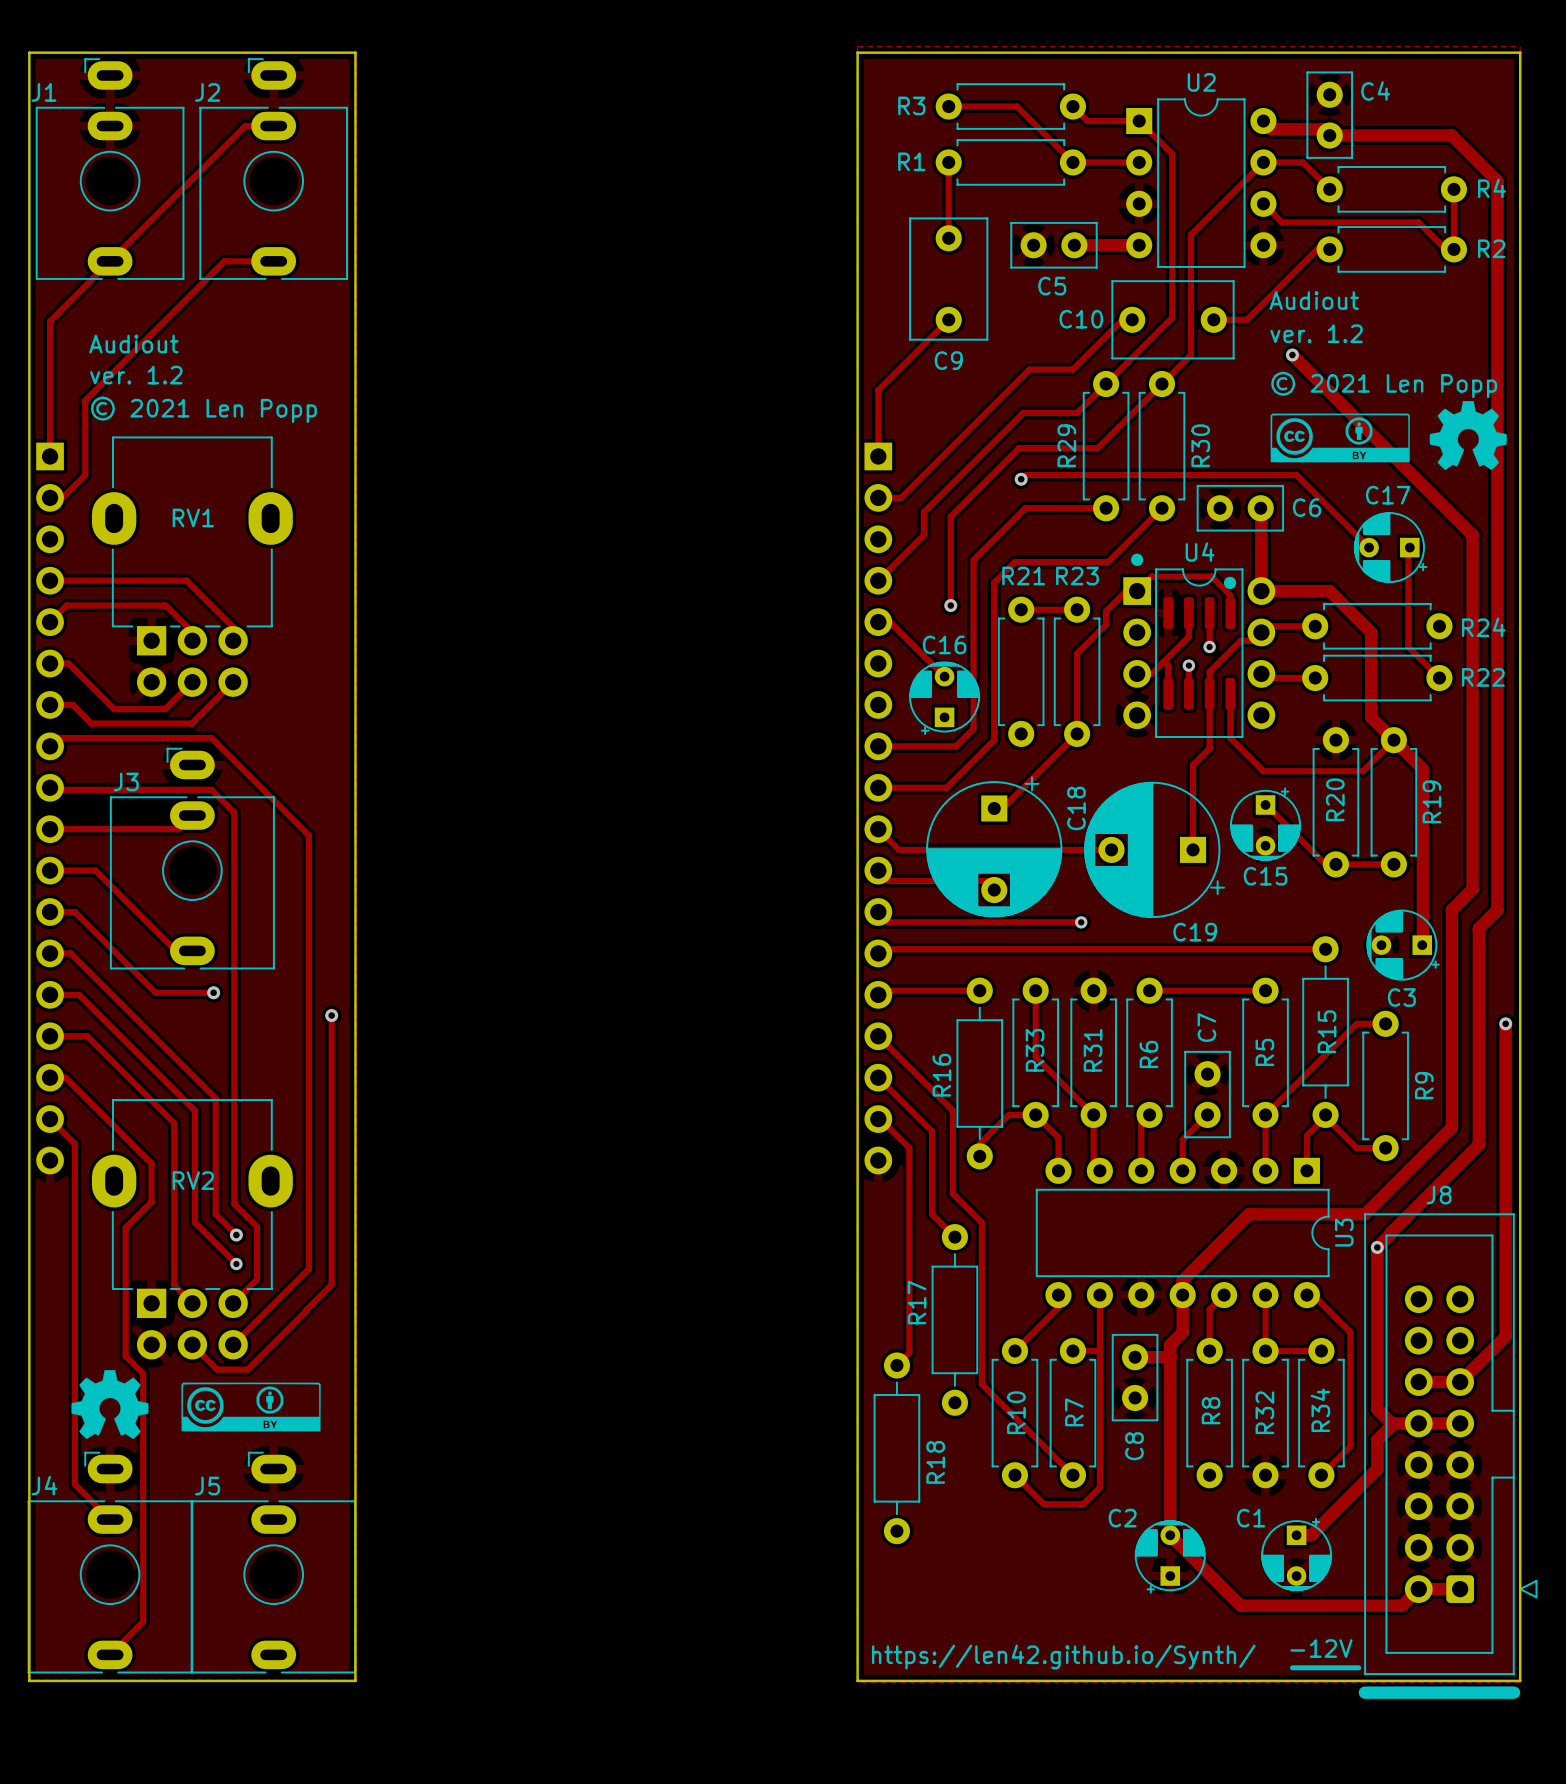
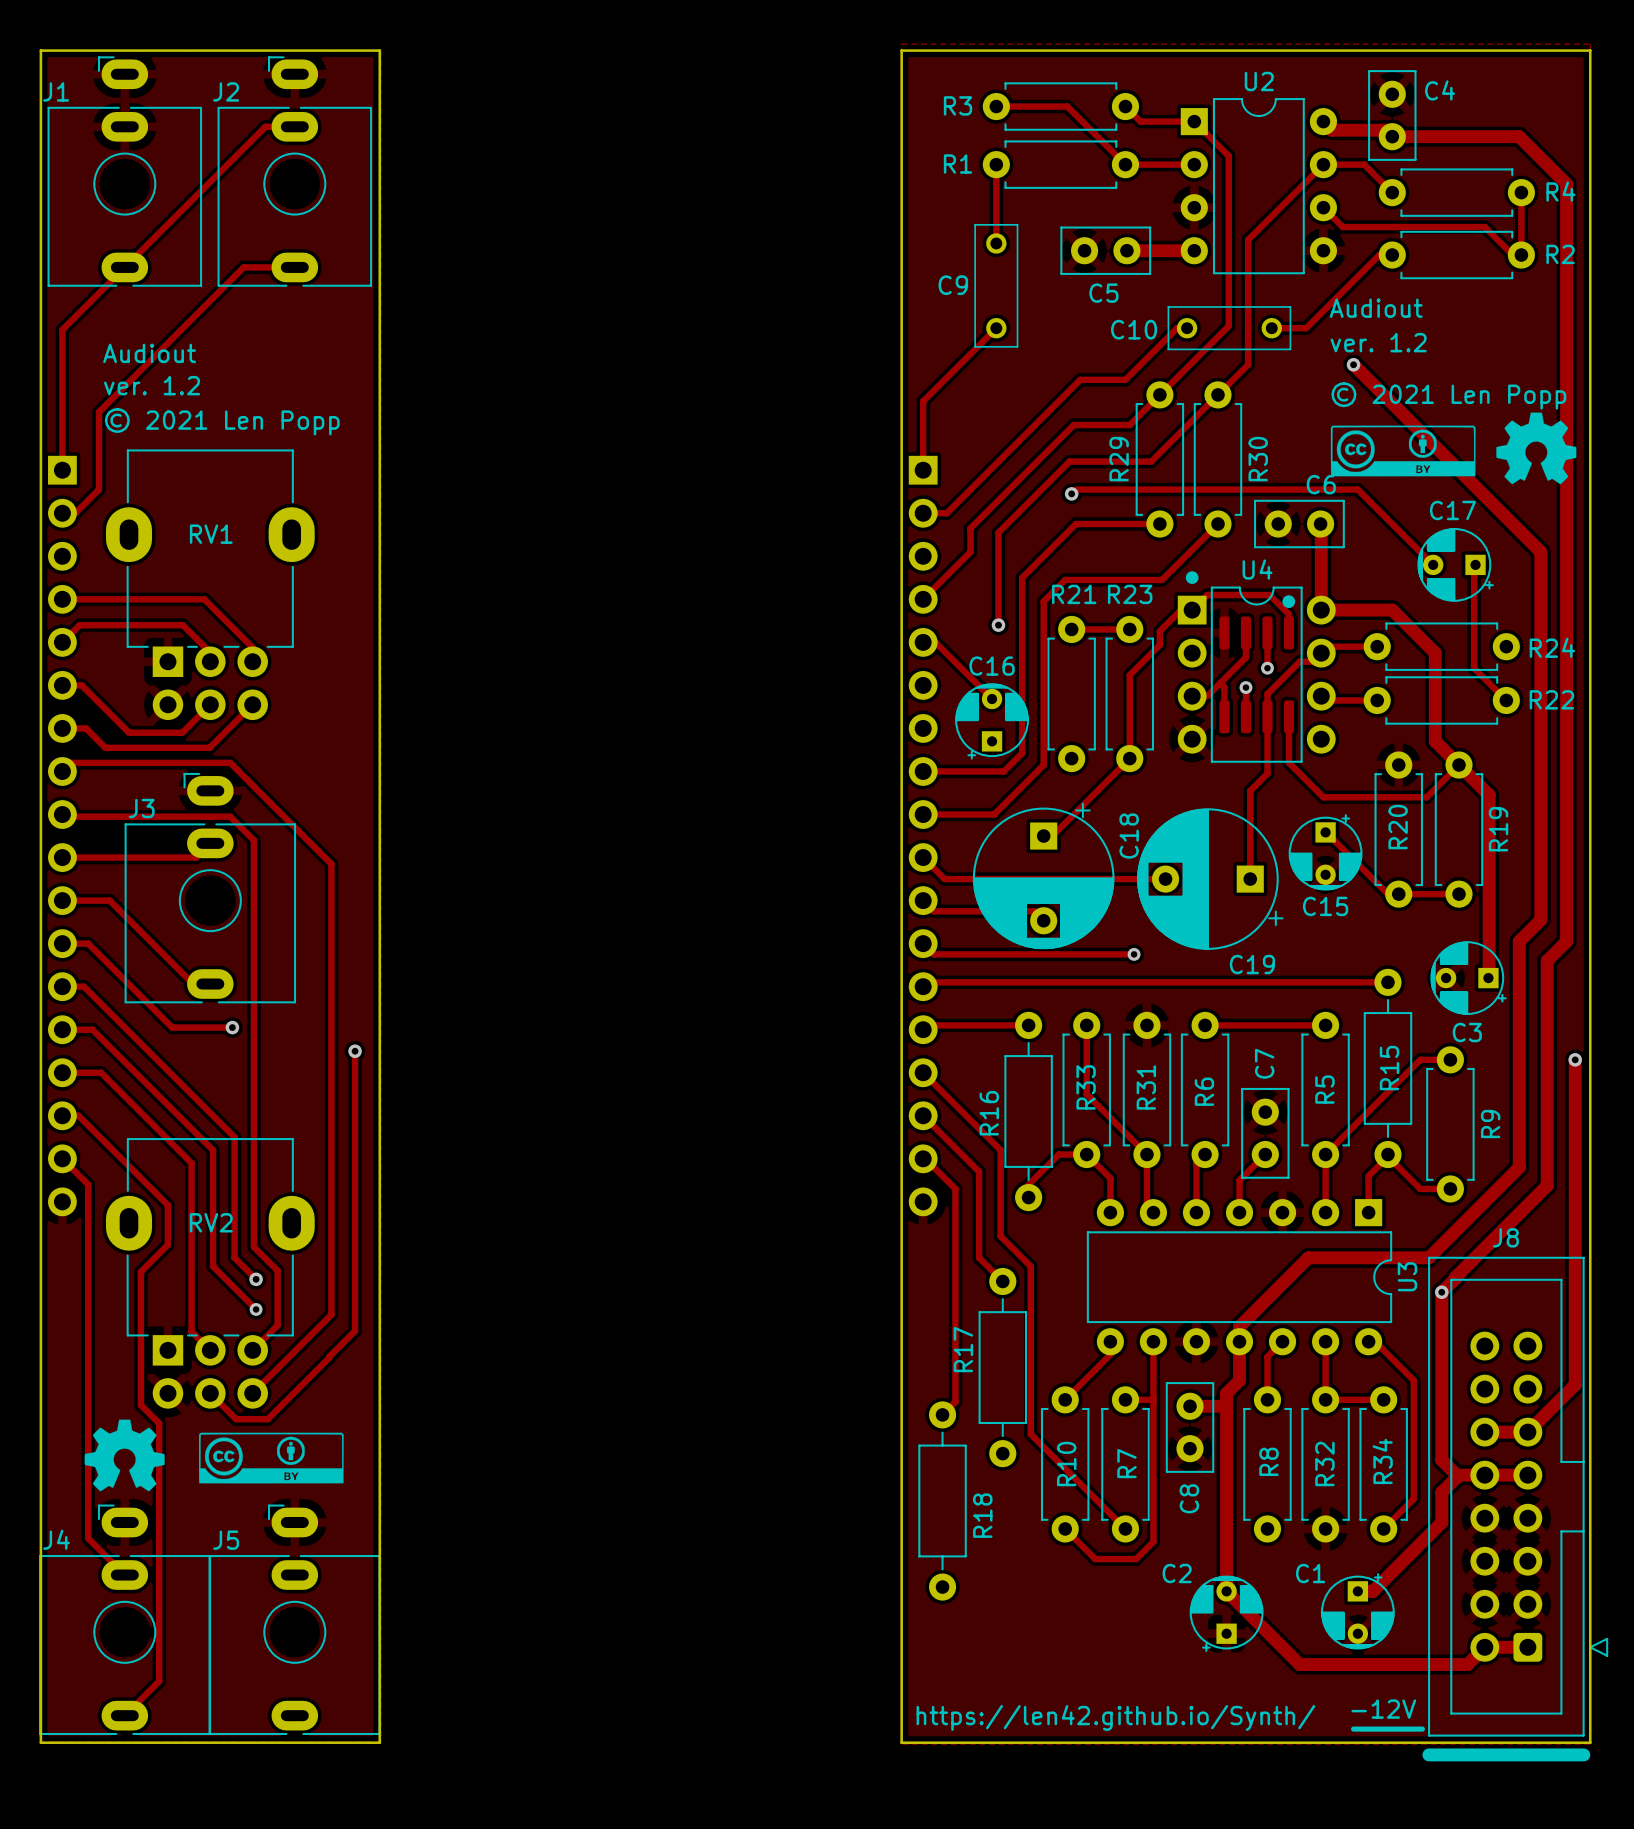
C9 footprint: [909, 217, 989, 341] -> [974, 223, 1019, 348]
C10 footprint: [1111, 280, 1235, 360] -> [1167, 306, 1292, 351]
C9 name position: C9 (948, 360) -> C9 (953, 285)
C6 name position: C6 (1306, 507) -> C6 (1321, 484)

